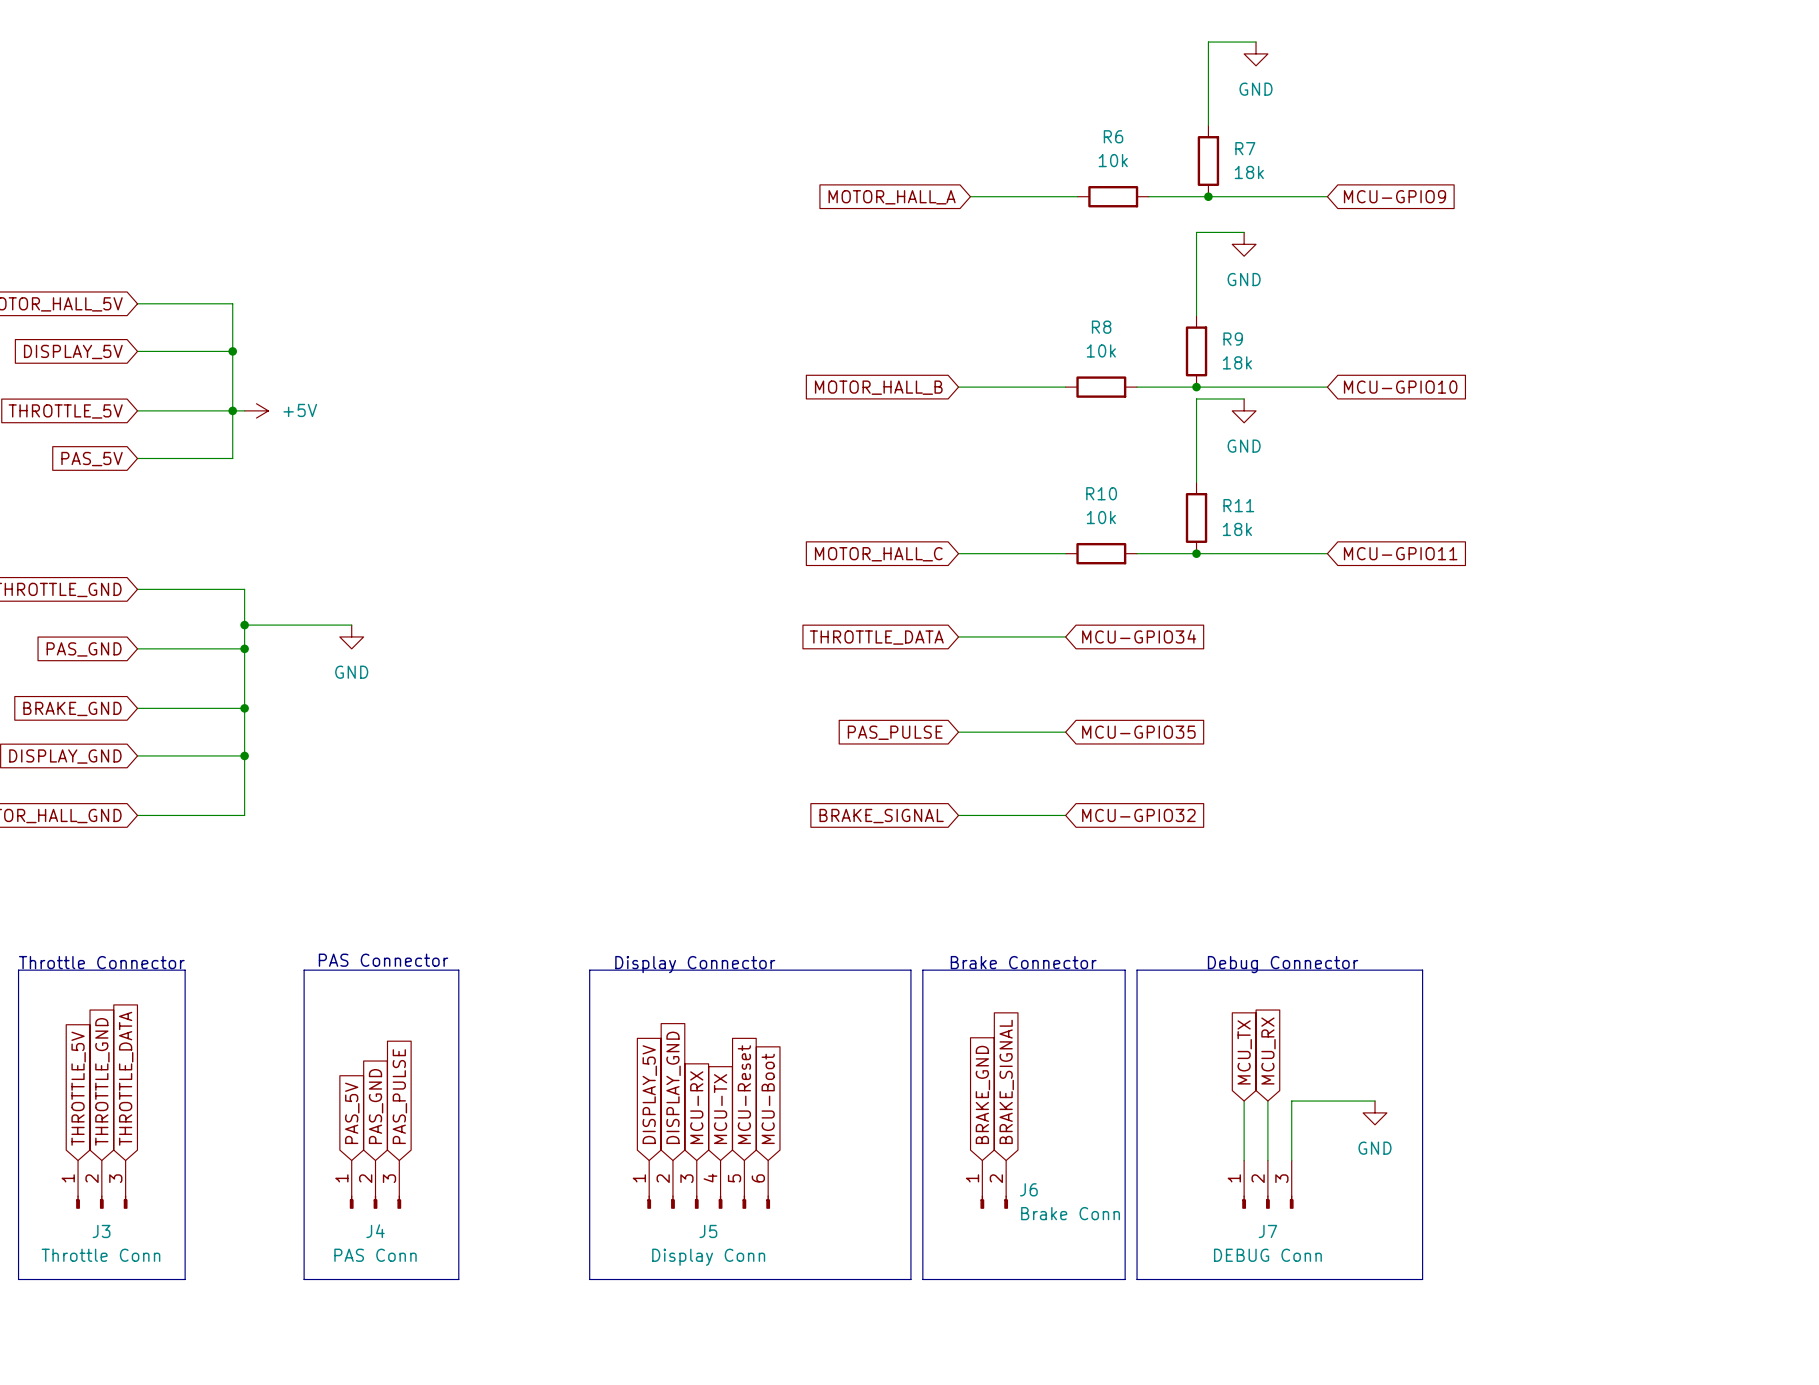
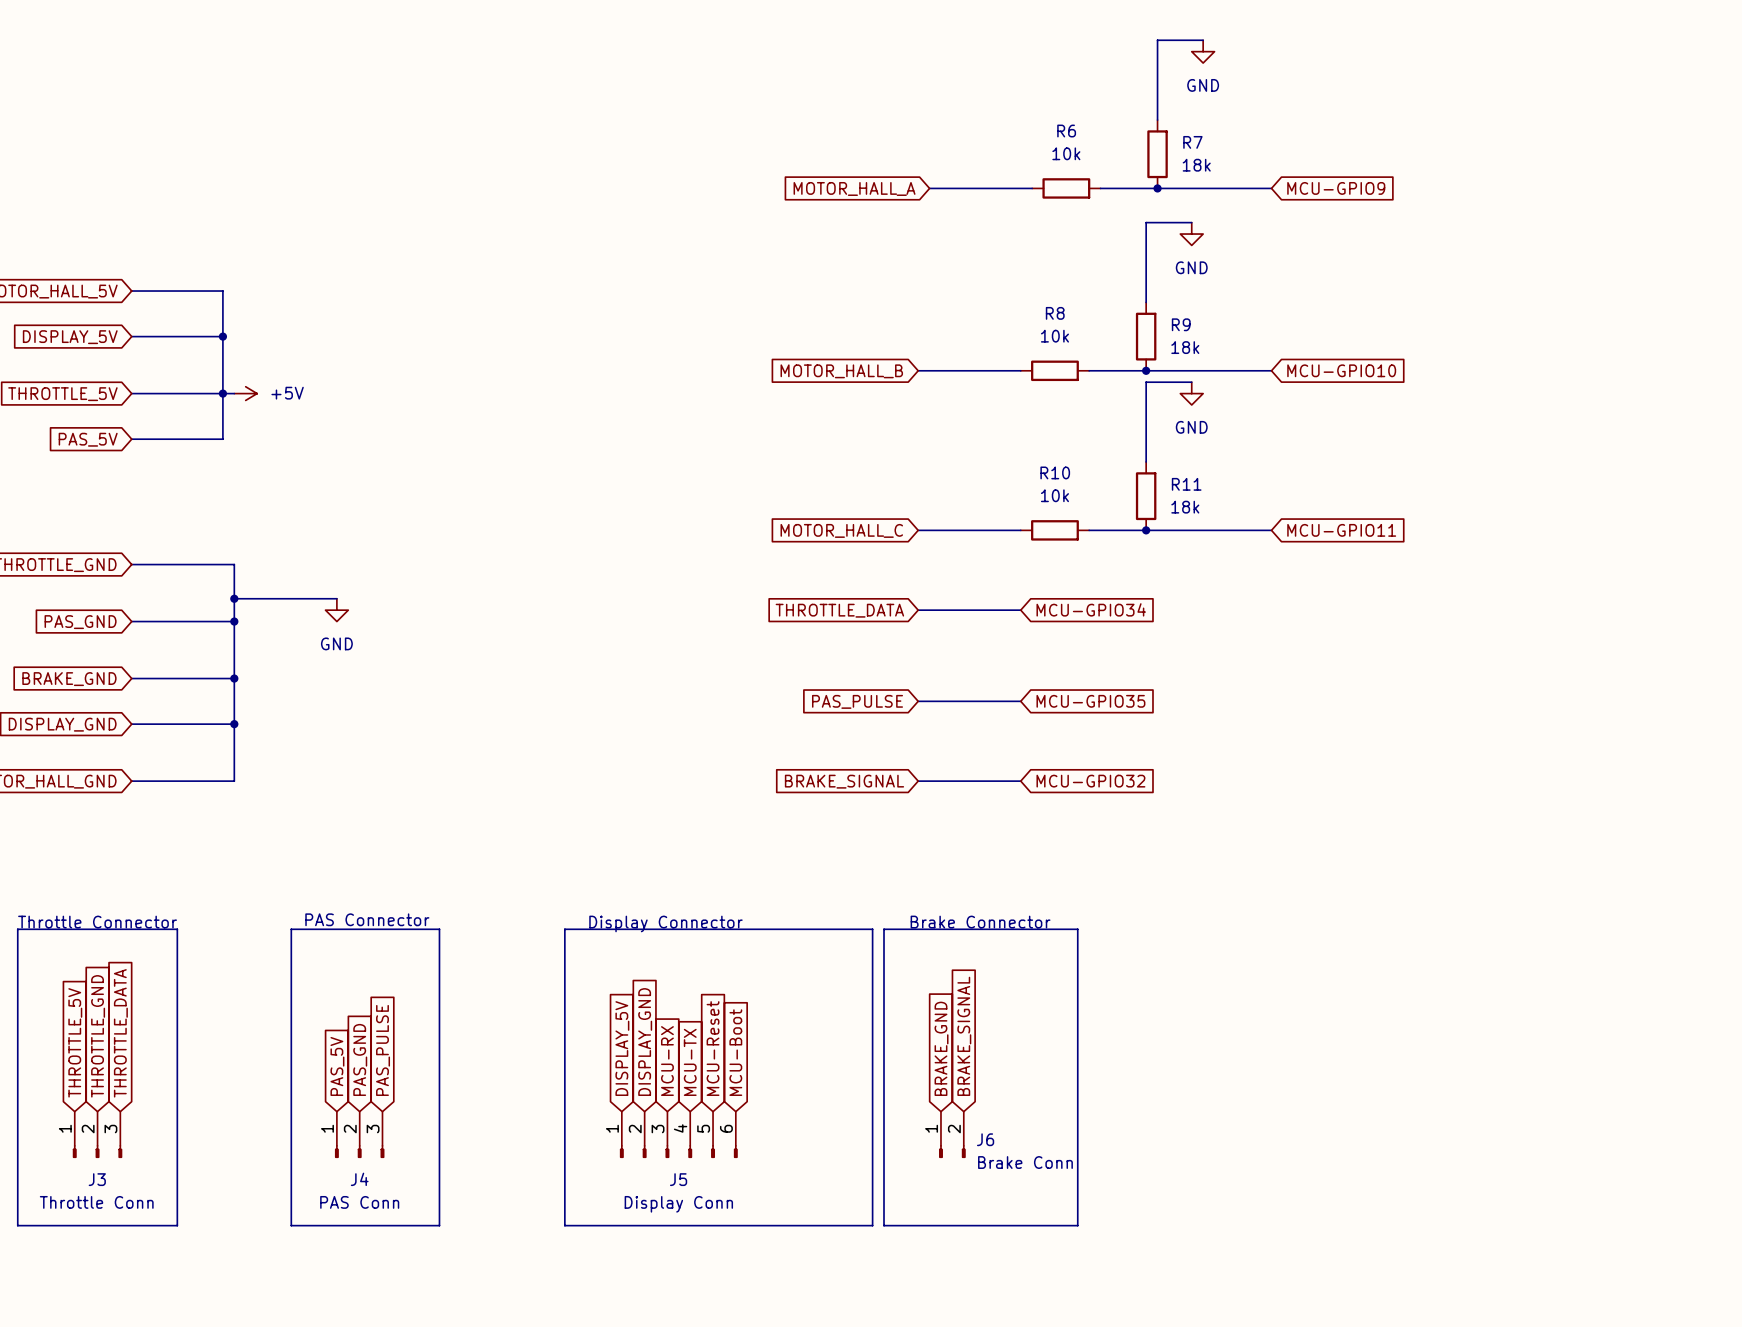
text: Debug Connector (1283, 964) -> none
line: (1137, 970) (1422, 970) (1422, 1279) (1137, 1279) (1137, 970) -> none
global label: MCU_RX (1268, 1051) -> none
global label: MCU_TX (1244, 1052) -> none
wire: (1244, 1101) (1244, 1160) -> none
wire: (1267, 1101) (1267, 1160) -> none
wire: (1375, 1101) (1291, 1101) (1291, 1160) -> none
power symbol: GND (1375, 1112) -> none
J7: DEBUG Conn (1267, 1184) -> none

